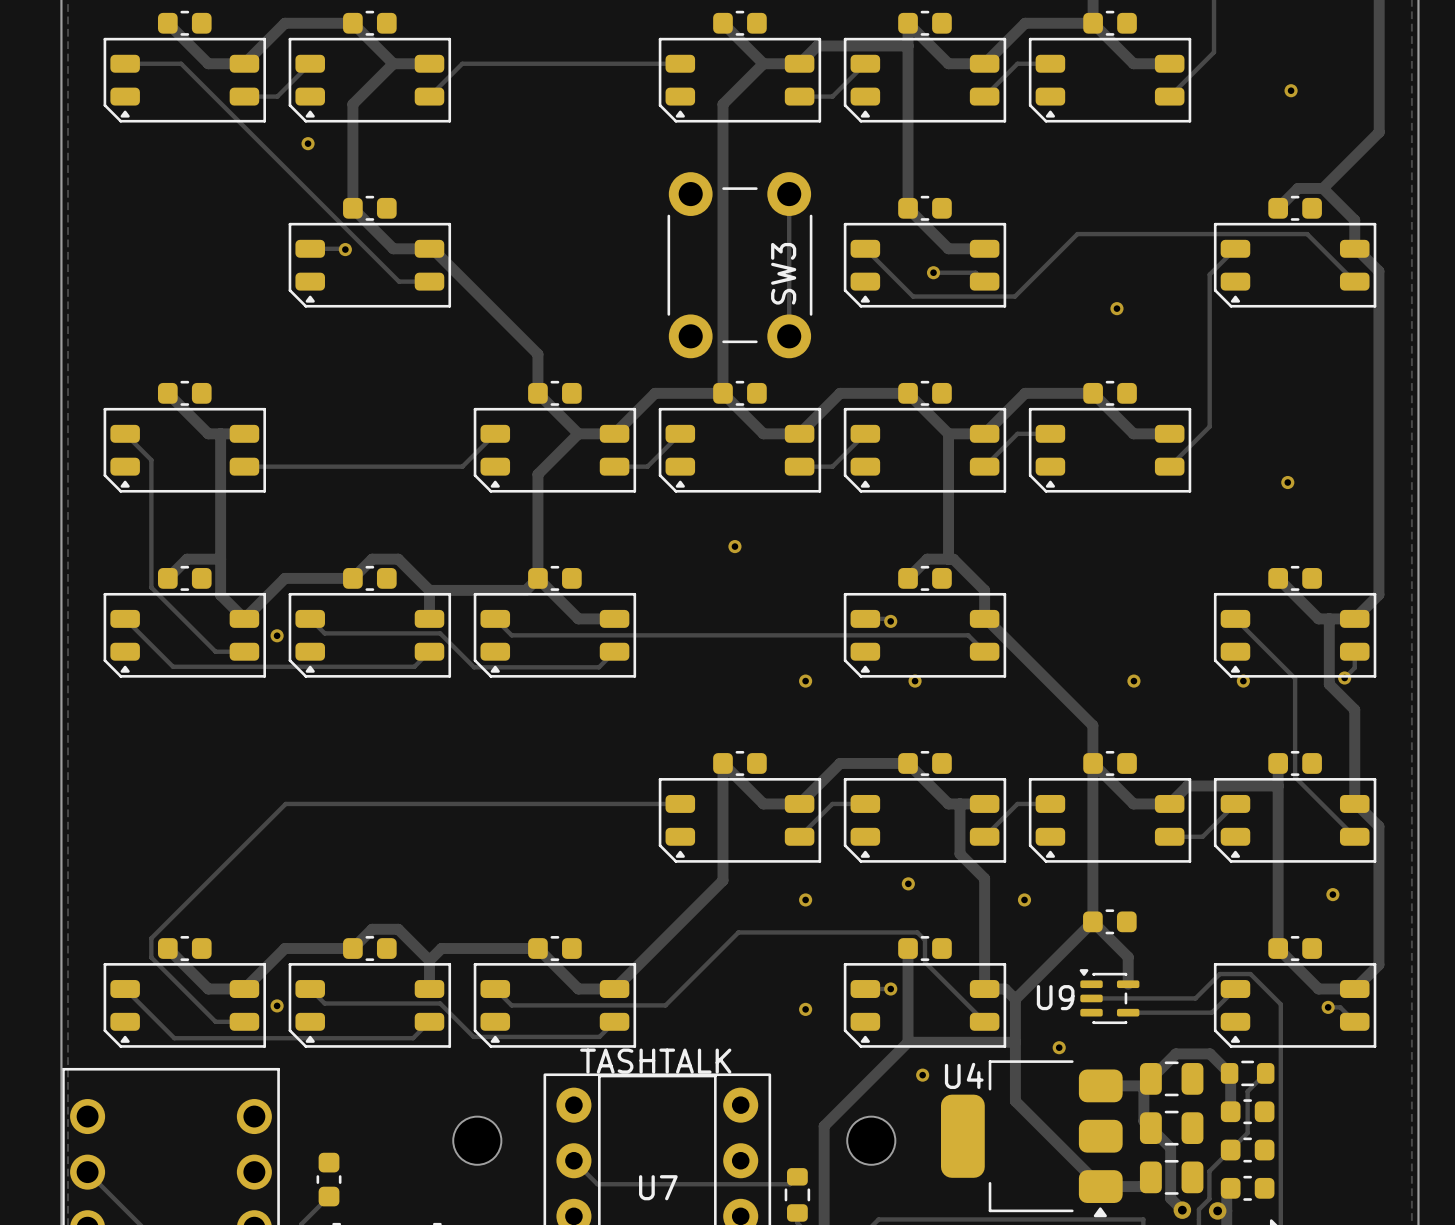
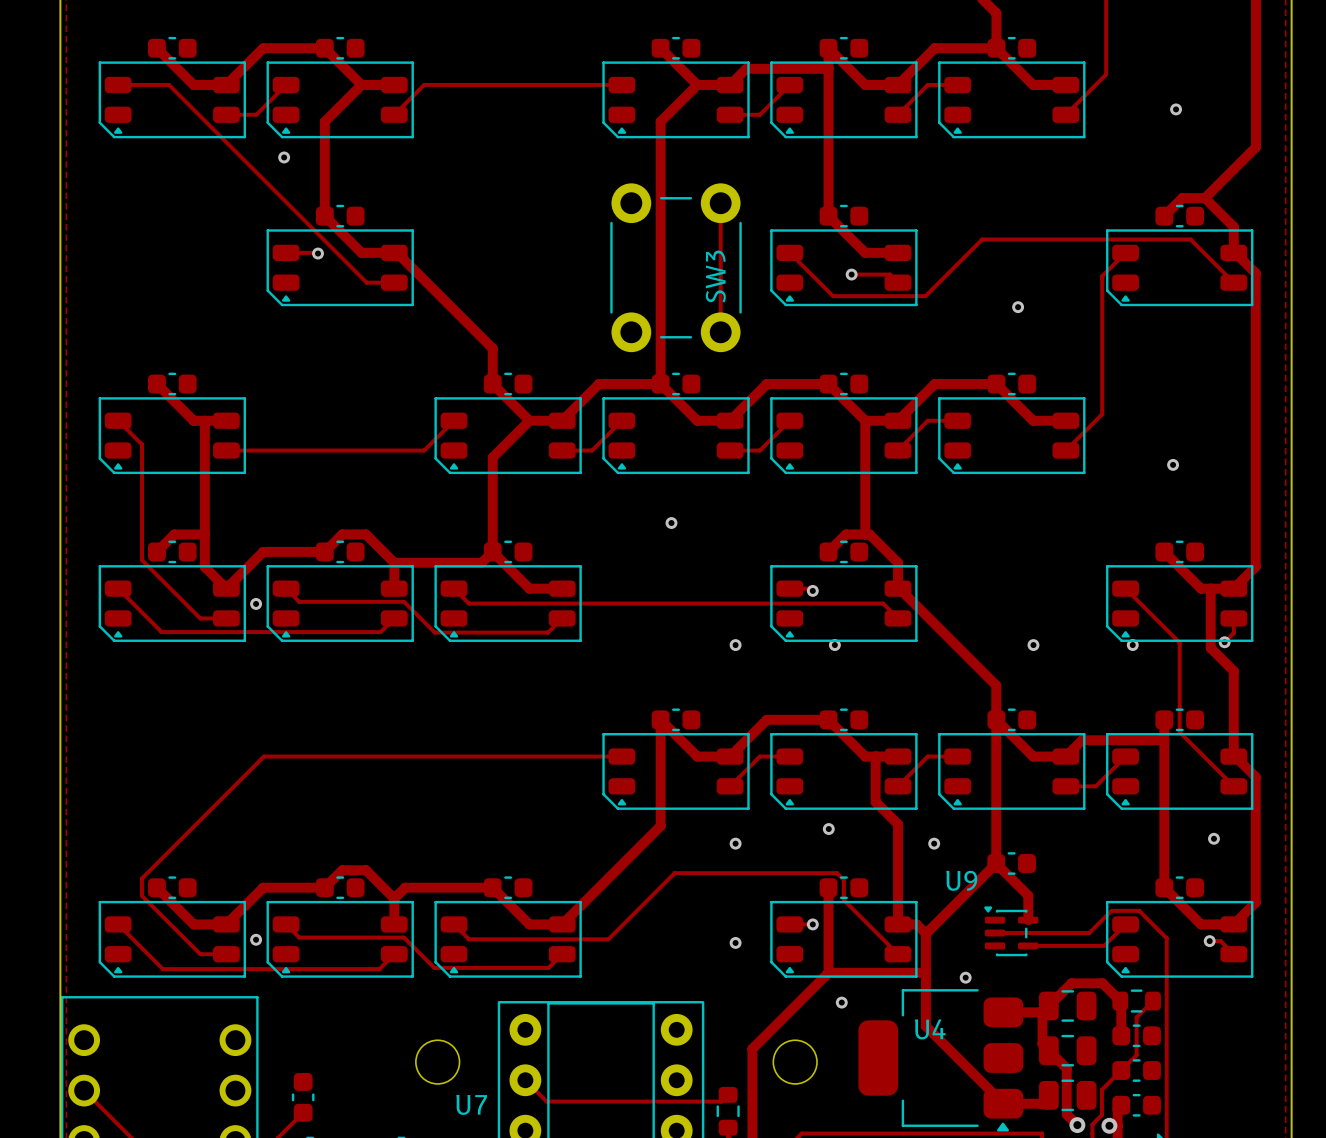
U9 name position: U9 (1055, 997) -> U9 (961, 880)
text: TASHTALK (655, 1061) -> none
U4 name position: U4 (964, 1075) -> U4 (930, 1029)
U7 name position: U7 (658, 1187) -> U7 (471, 1104)

